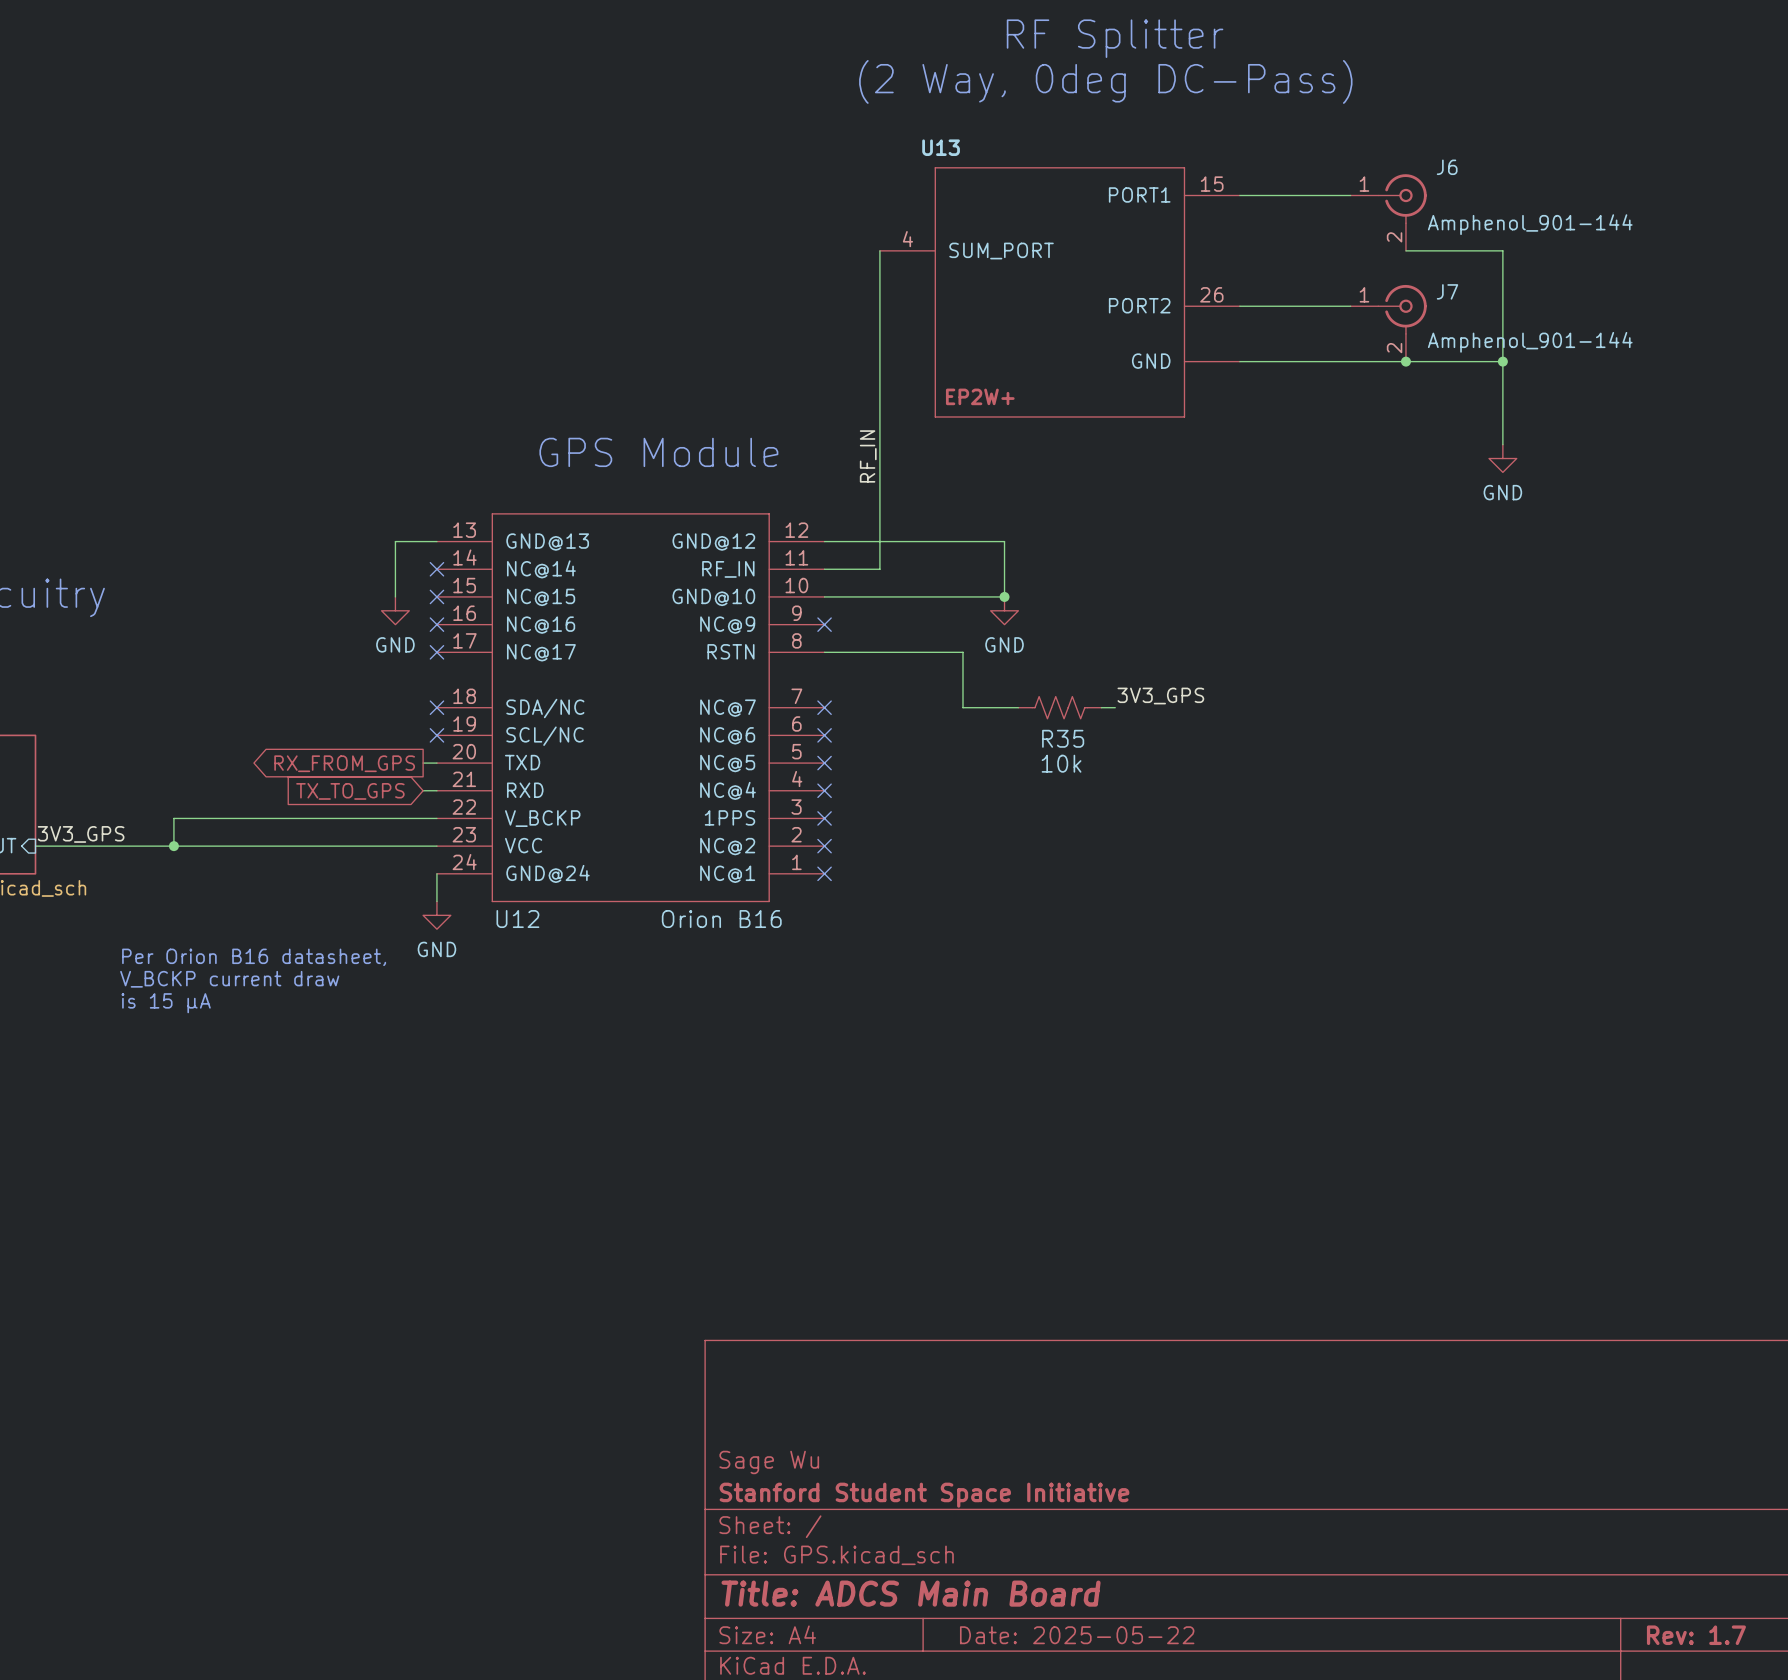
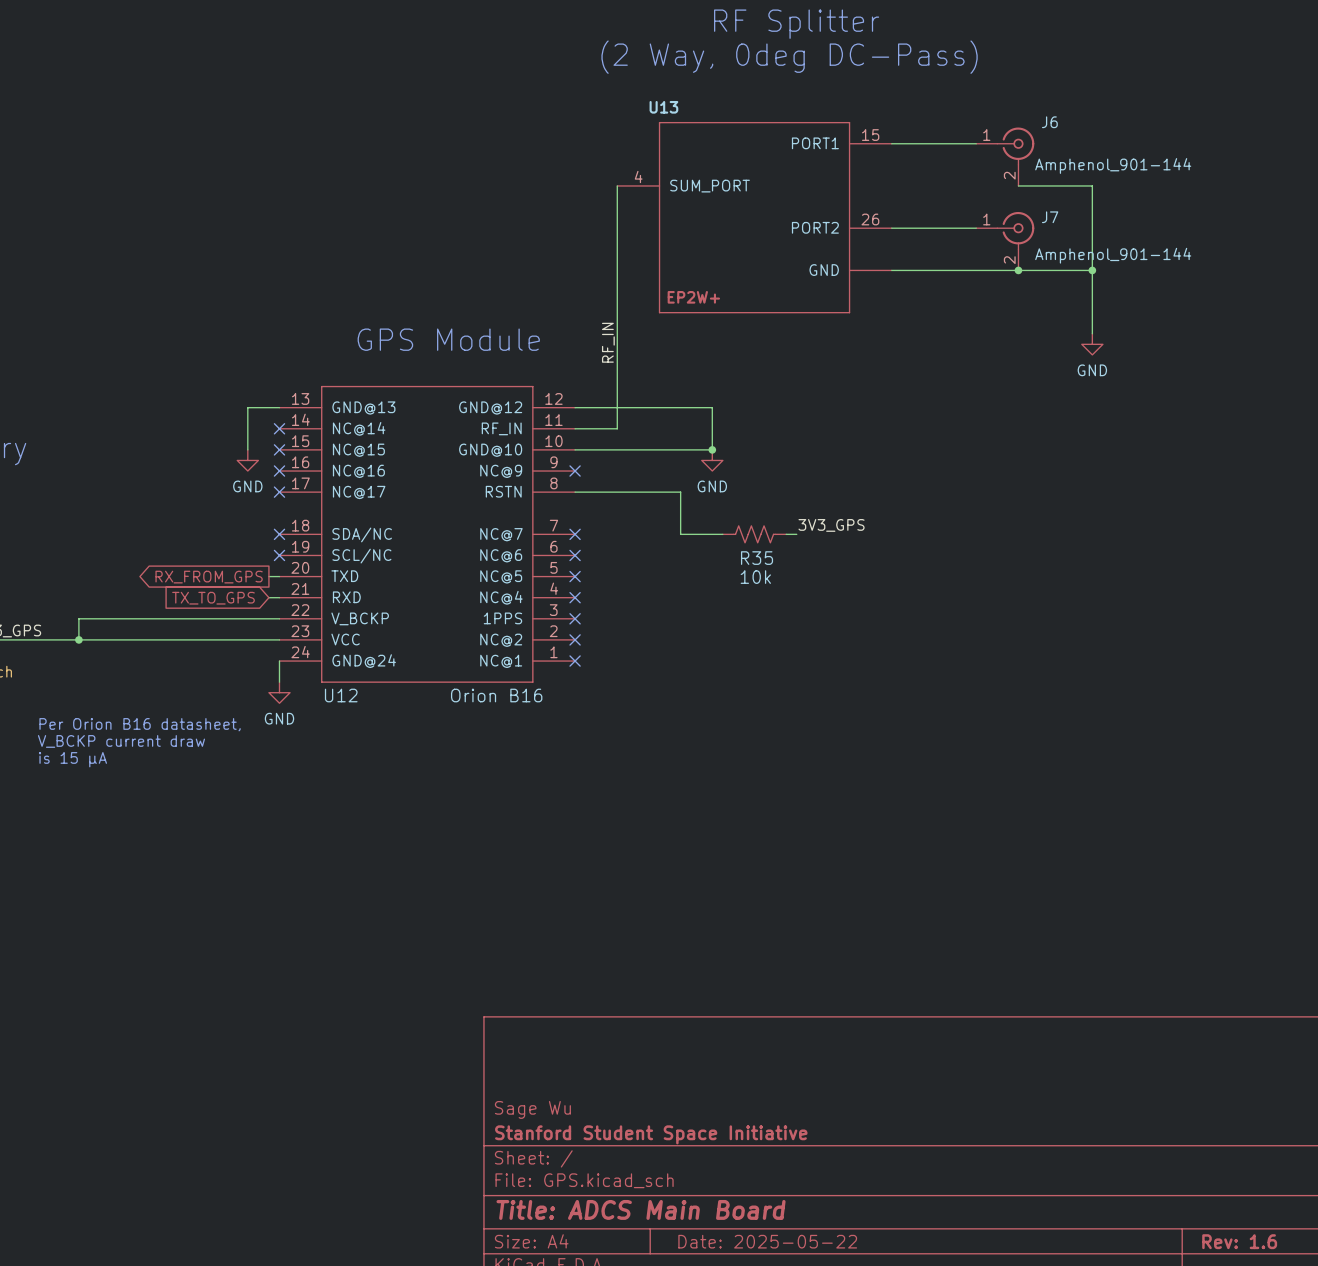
title block: Rev: 1.7 (1696, 1635) -> Rev: 1.6 (1239, 1241)

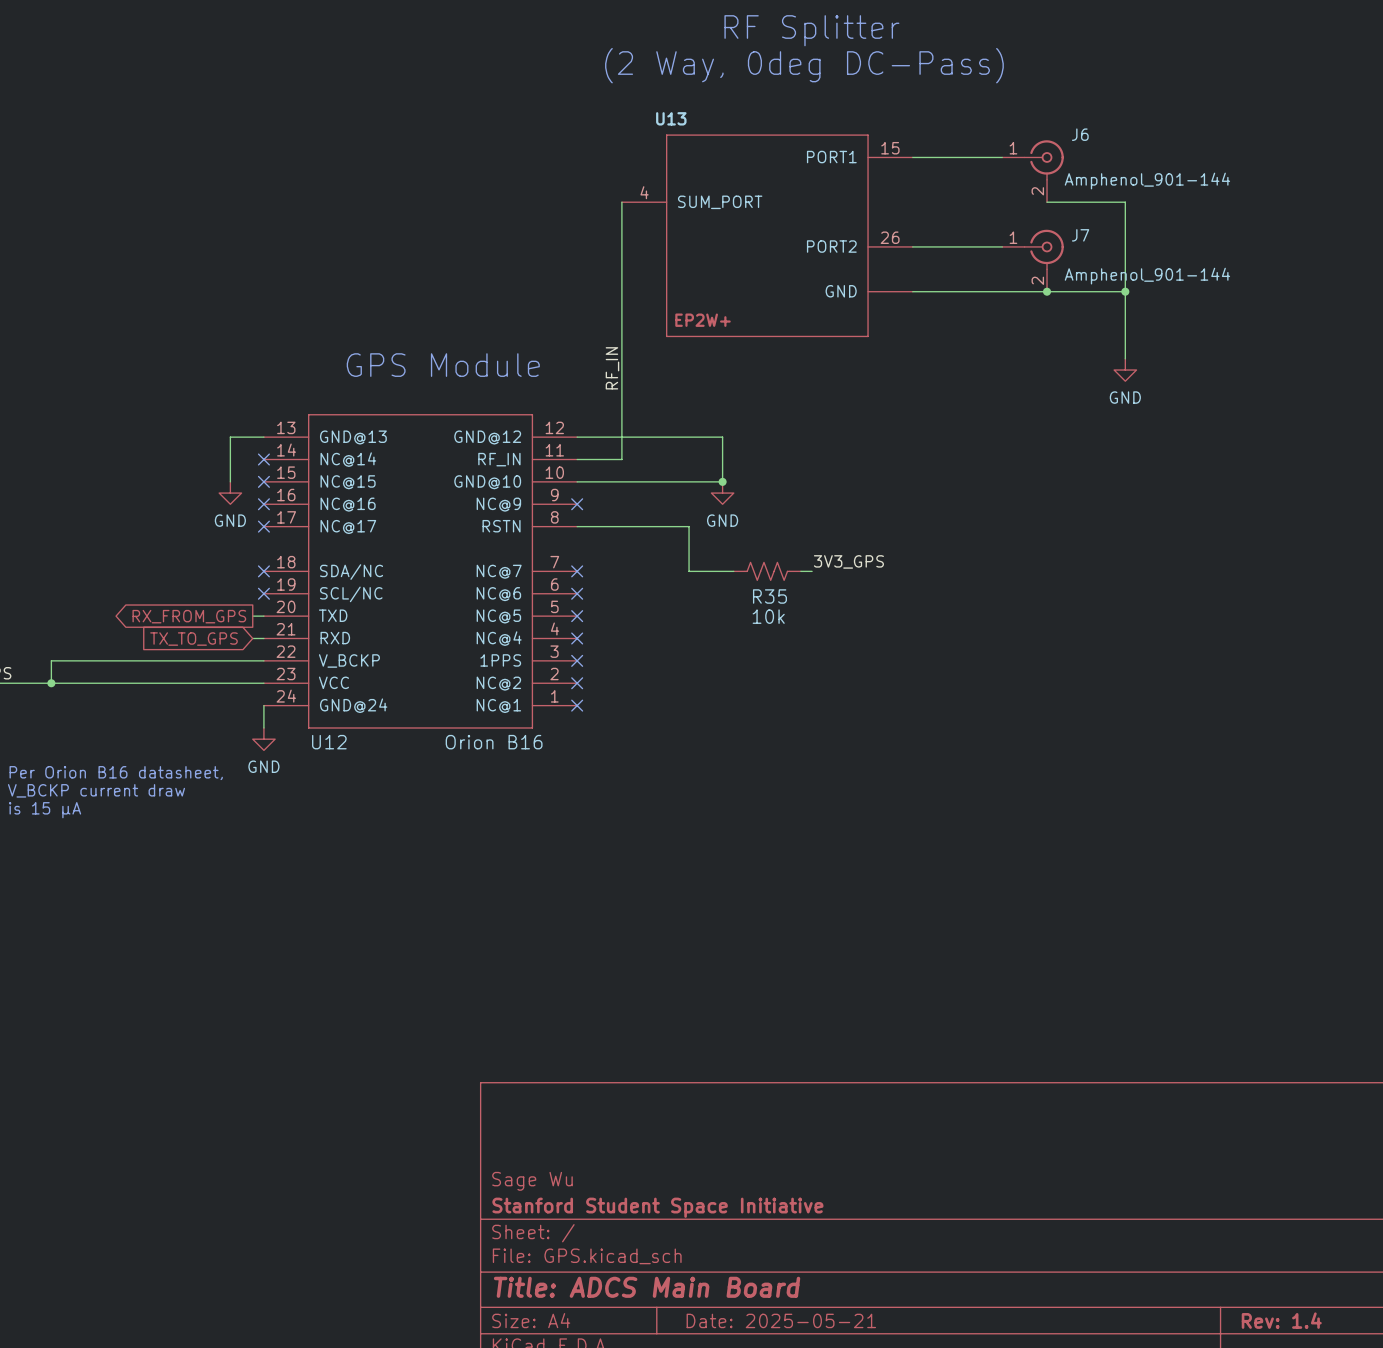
title block: Date: 2025-05-22 (767, 1241) -> Date: 2025-05-21 (781, 1320)
title block: Rev: 1.6 (1239, 1241) -> Rev: 1.4 (1281, 1320)

